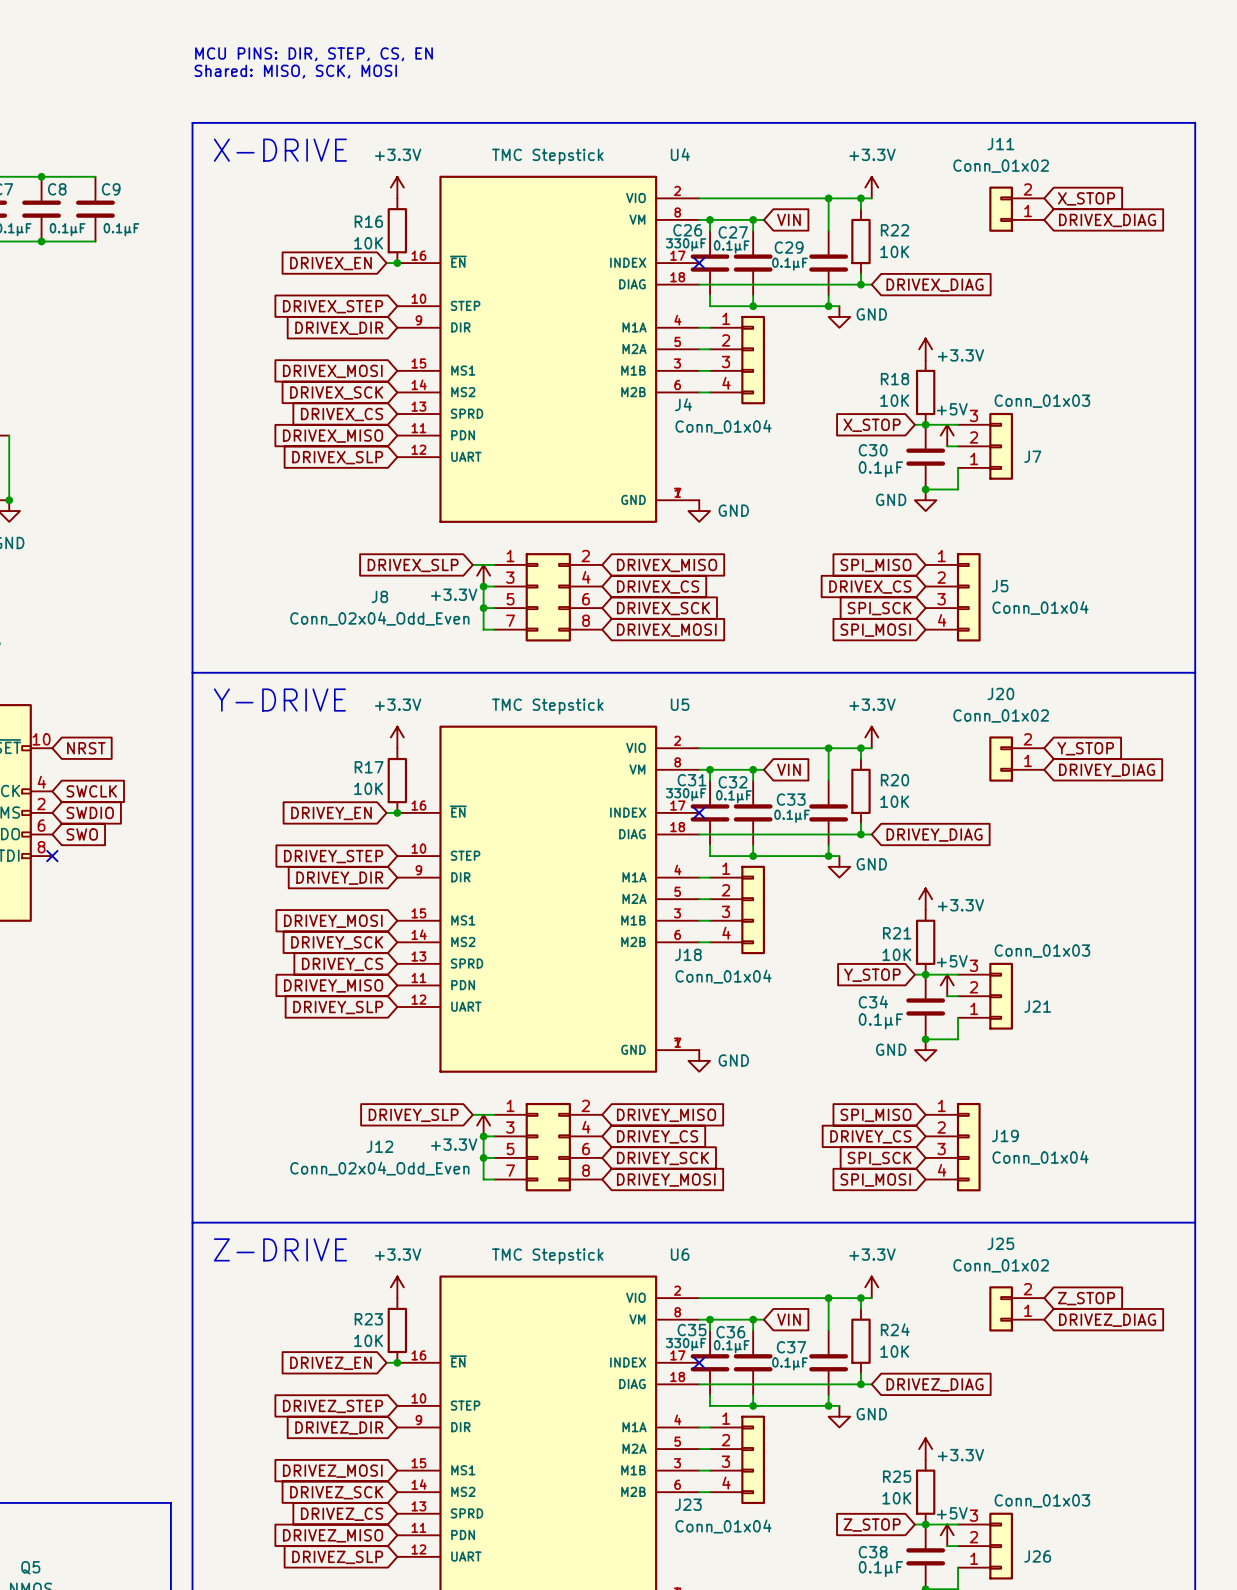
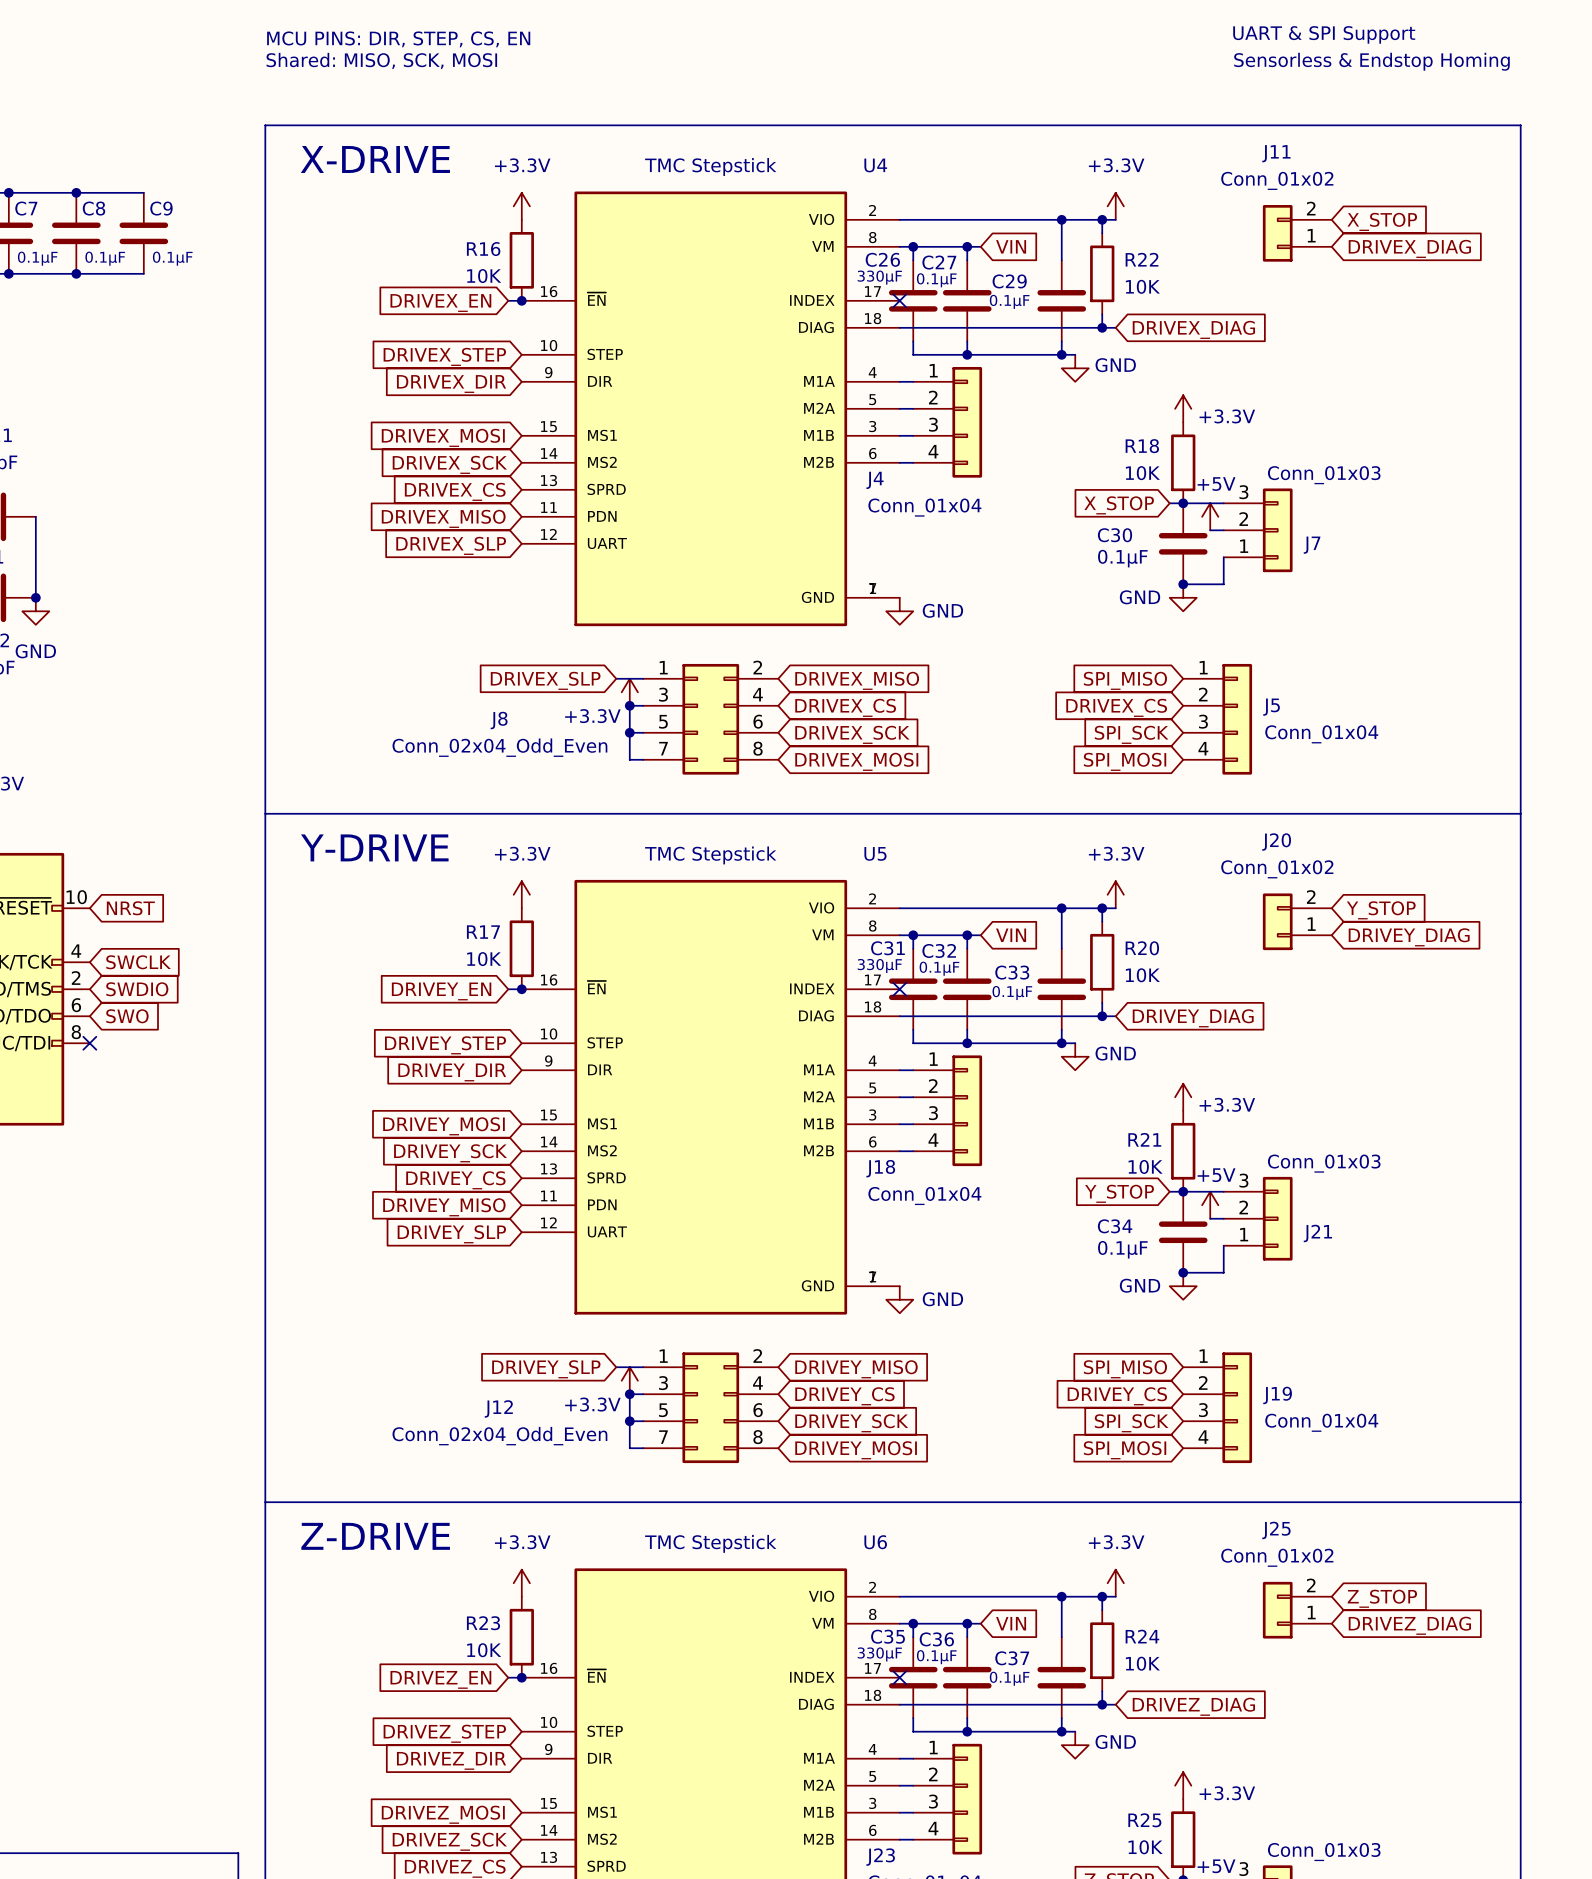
text: none -> UART & SPI Support (1324, 34)
text: none -> Sensorless & Endstop Homing (1371, 61)

